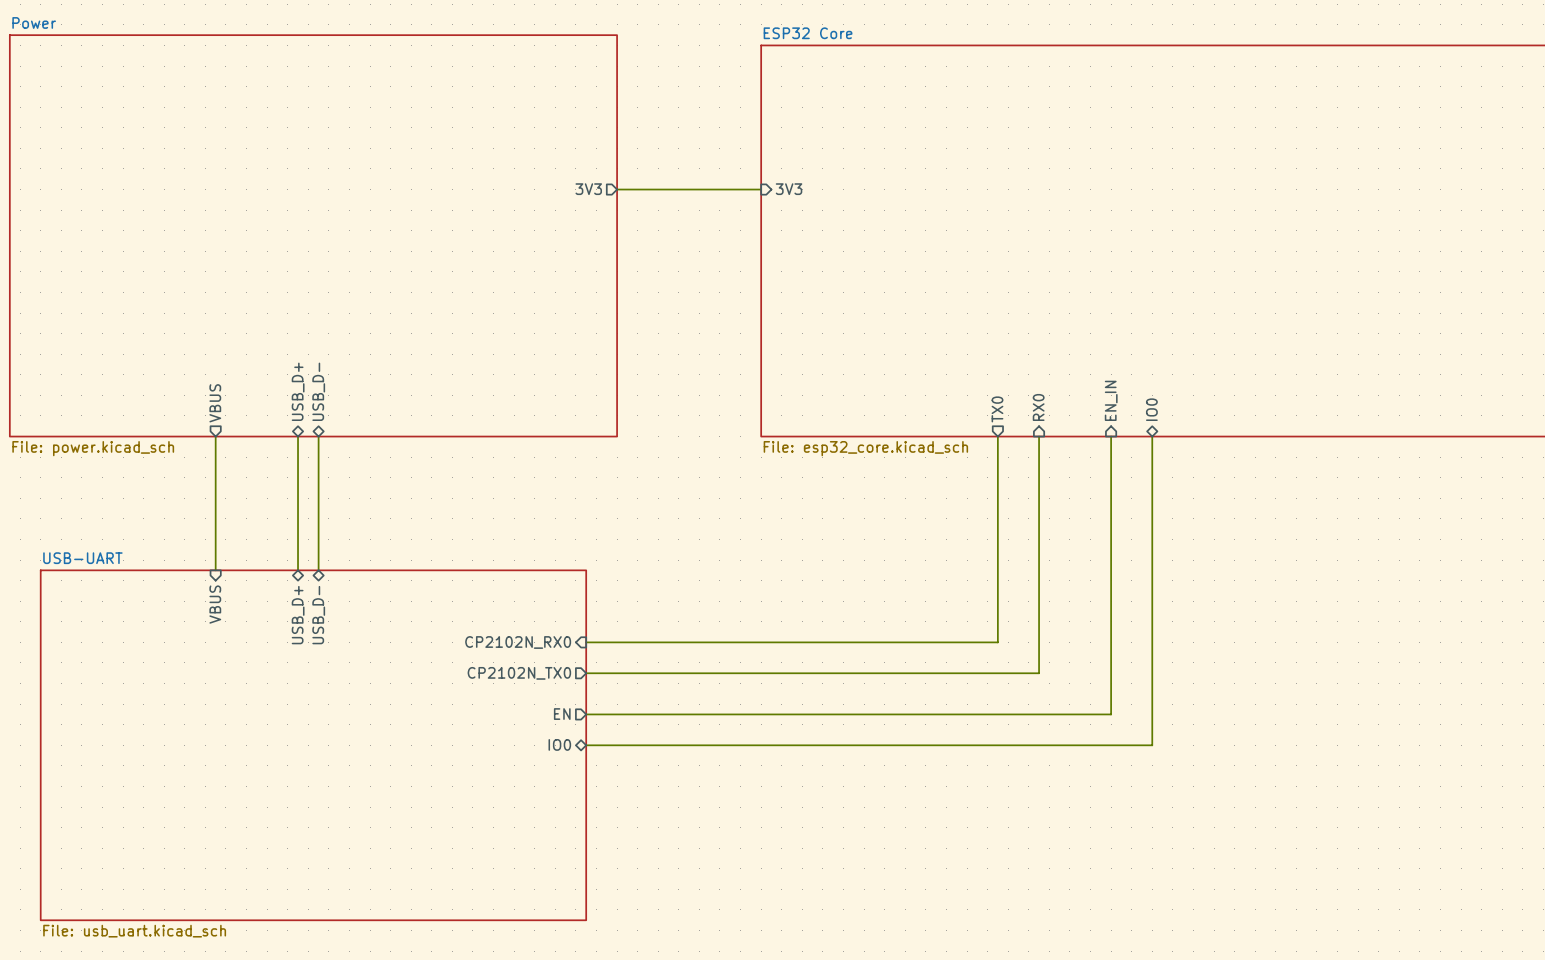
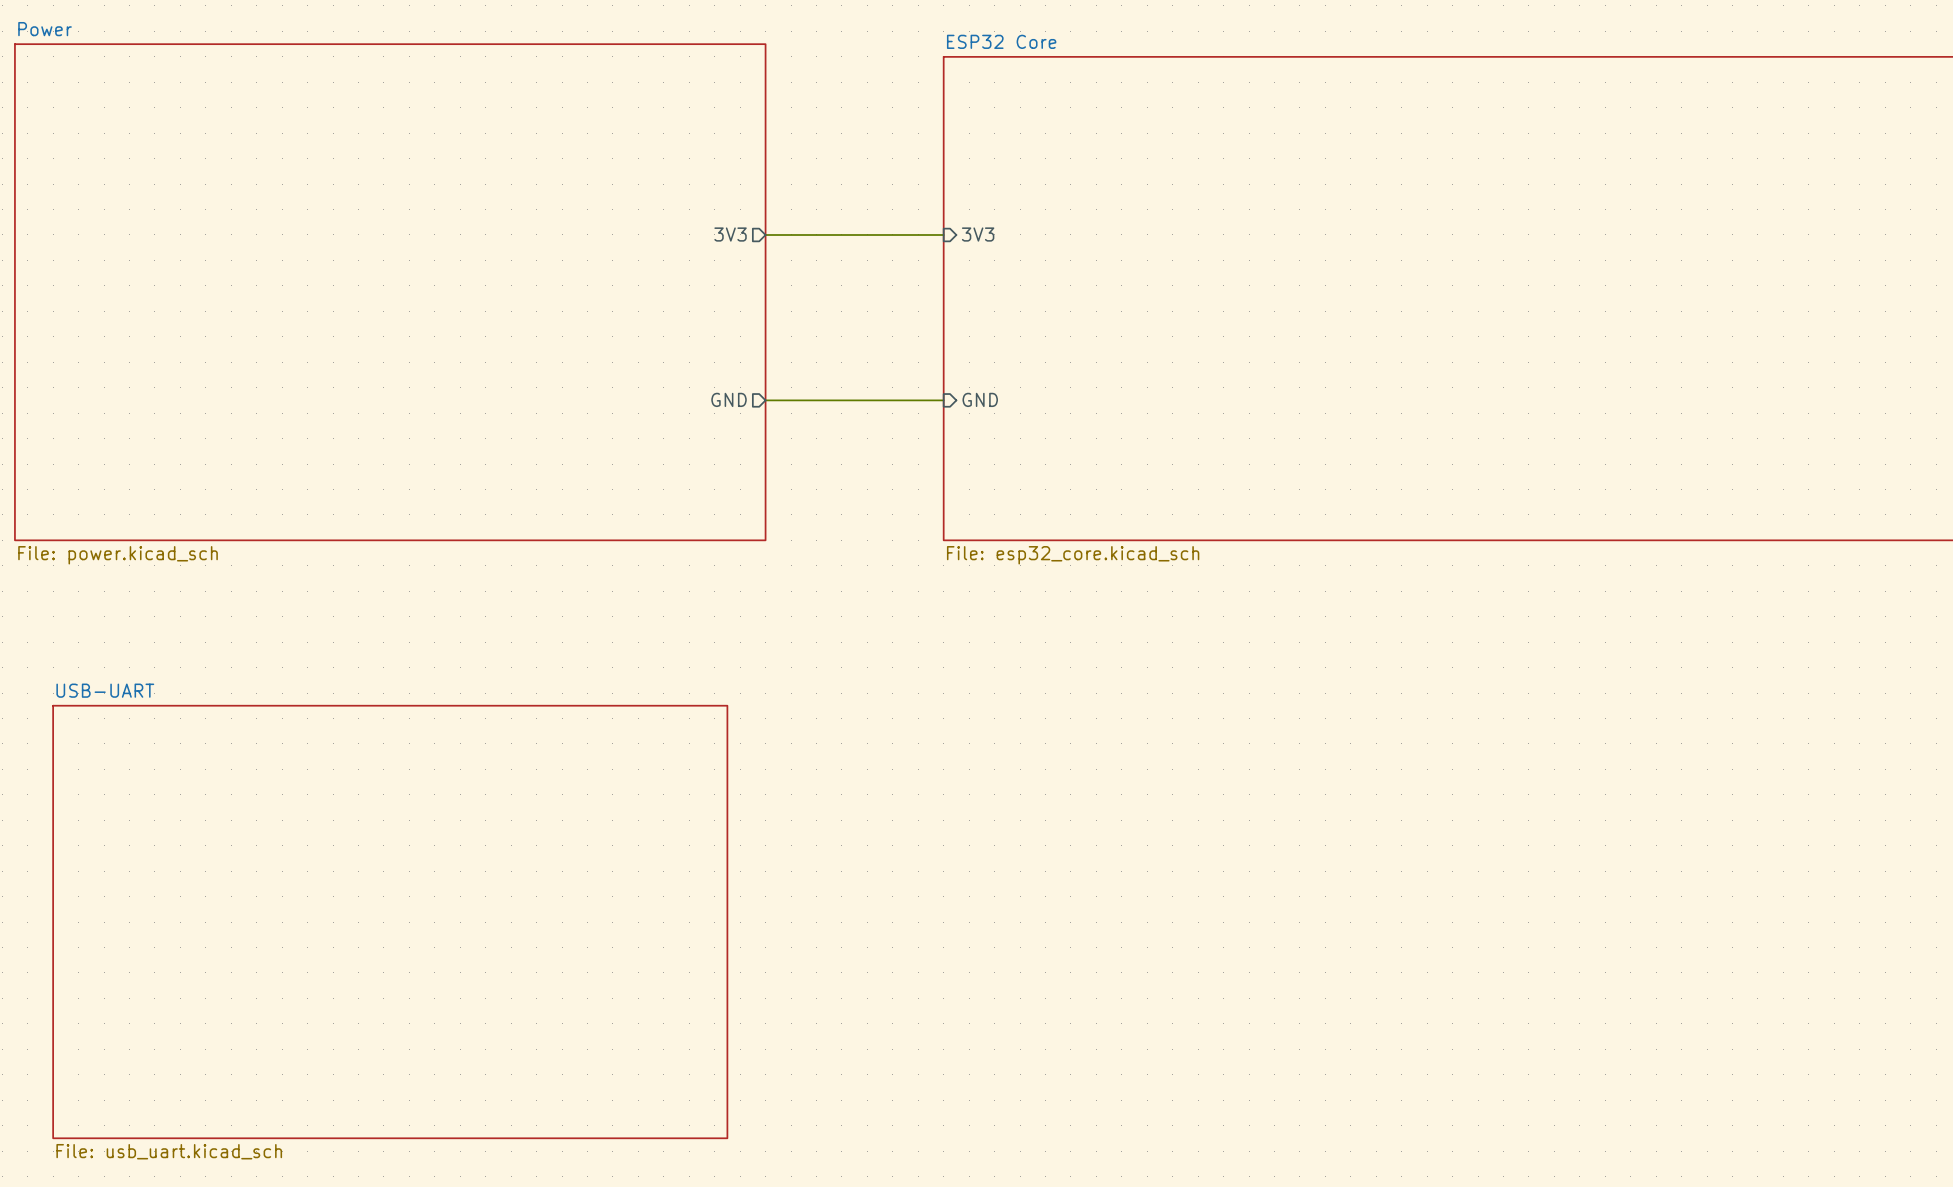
sheet pin: none -> GND (729, 399)
sheet pin: none -> GND (980, 399)
wire: none -> (765, 400) (943, 400)
sheet pin: USB_D+ (298, 391) -> none
sheet pin: USB_D- (318, 391) -> none
sheet pin: EN_IN (1111, 400) -> none
sheet pin: VBUS (215, 403) -> none
sheet pin: RX0 (1038, 407) -> none
sheet pin: TX0 (997, 409) -> none
sheet pin: IO0 (1151, 409) -> none
wire: (215, 436) (215, 570) -> none
wire: (298, 436) (298, 570) -> none
wire: (318, 436) (318, 570) -> none
wire: (997, 436) (997, 642) (586, 642) -> none
wire: (1039, 436) (1039, 673) (586, 673) -> none
wire: (1111, 436) (1111, 714) (586, 714) -> none
wire: (1152, 436) (1152, 745) (586, 745) -> none
sheet pin: VBUS (215, 604) -> none
sheet pin: USB_D+ (298, 615) -> none
sheet pin: USB_D- (318, 615) -> none
sheet pin: CP2102N_RX0 (518, 642) -> none
sheet pin: CP2102N_TX0 (519, 673) -> none
sheet pin: EN (562, 714) -> none
sheet pin: IO0 (559, 744) -> none

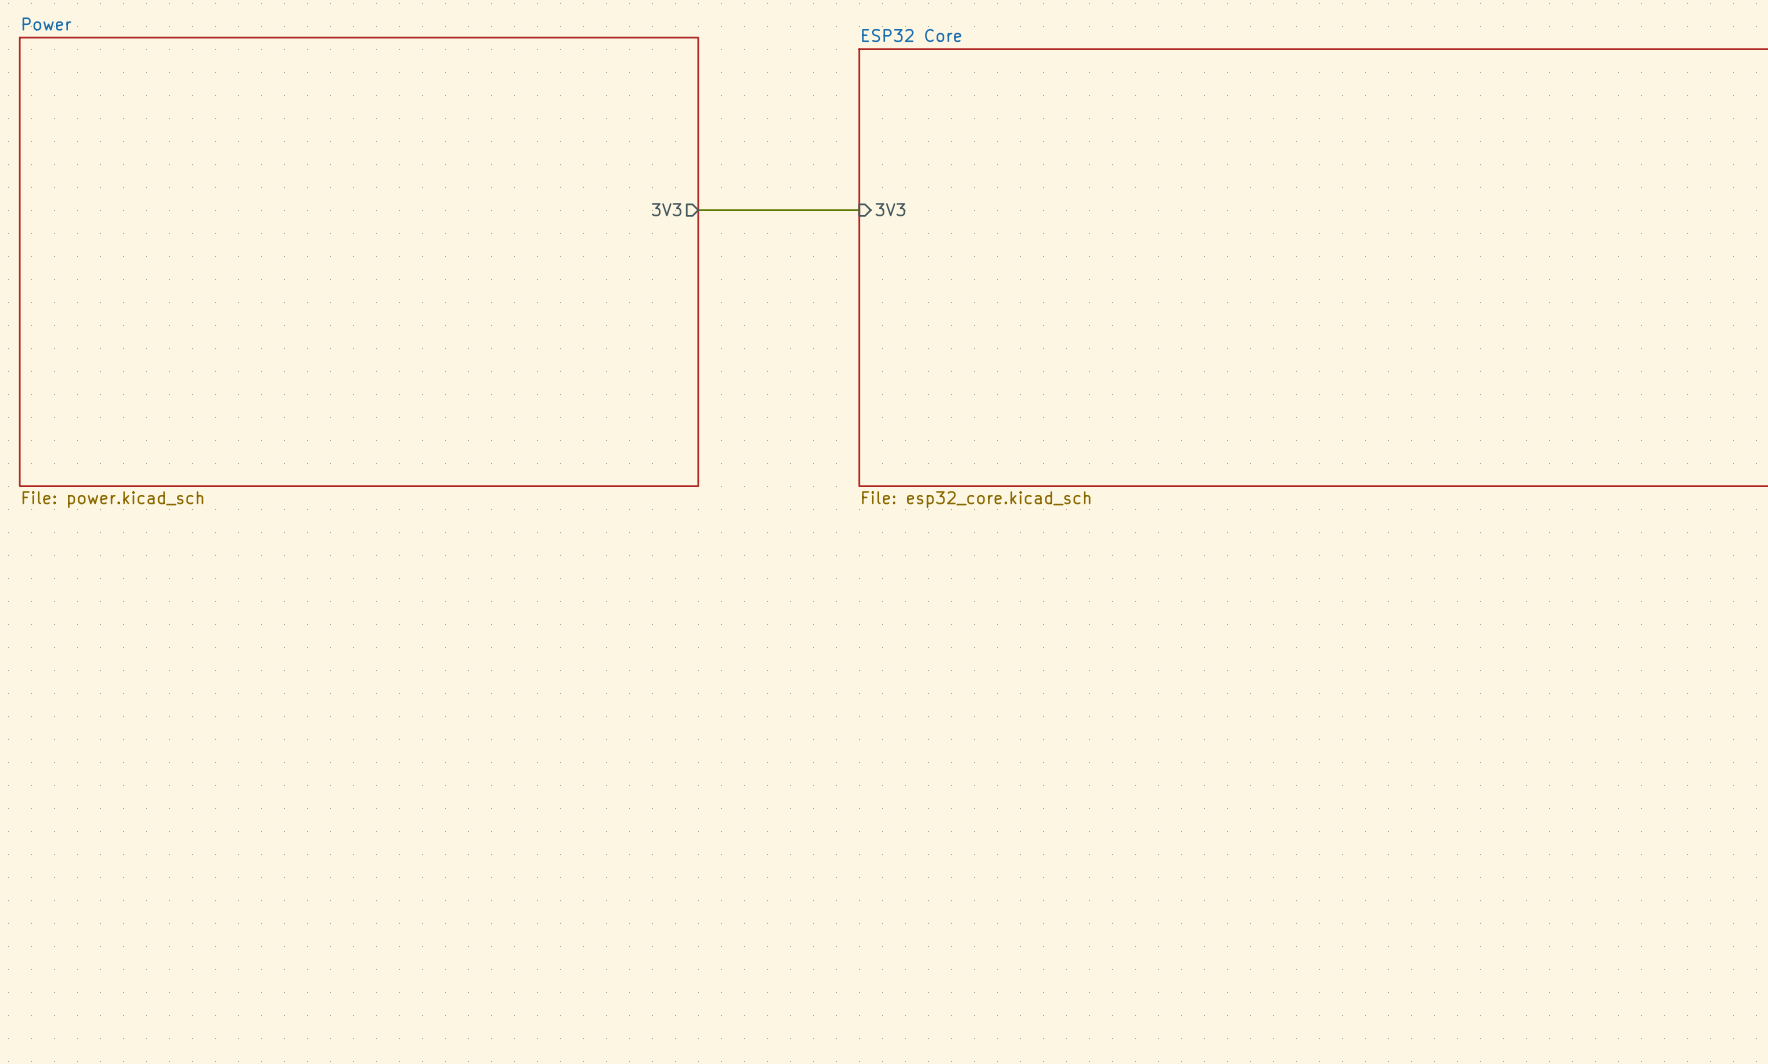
sheet pin: GND (729, 399) -> none
sheet pin: GND (980, 399) -> none
wire: (765, 400) (943, 400) -> none
sheet USB-UART: File: usb_uart.kicad_sch (390, 922) -> none

